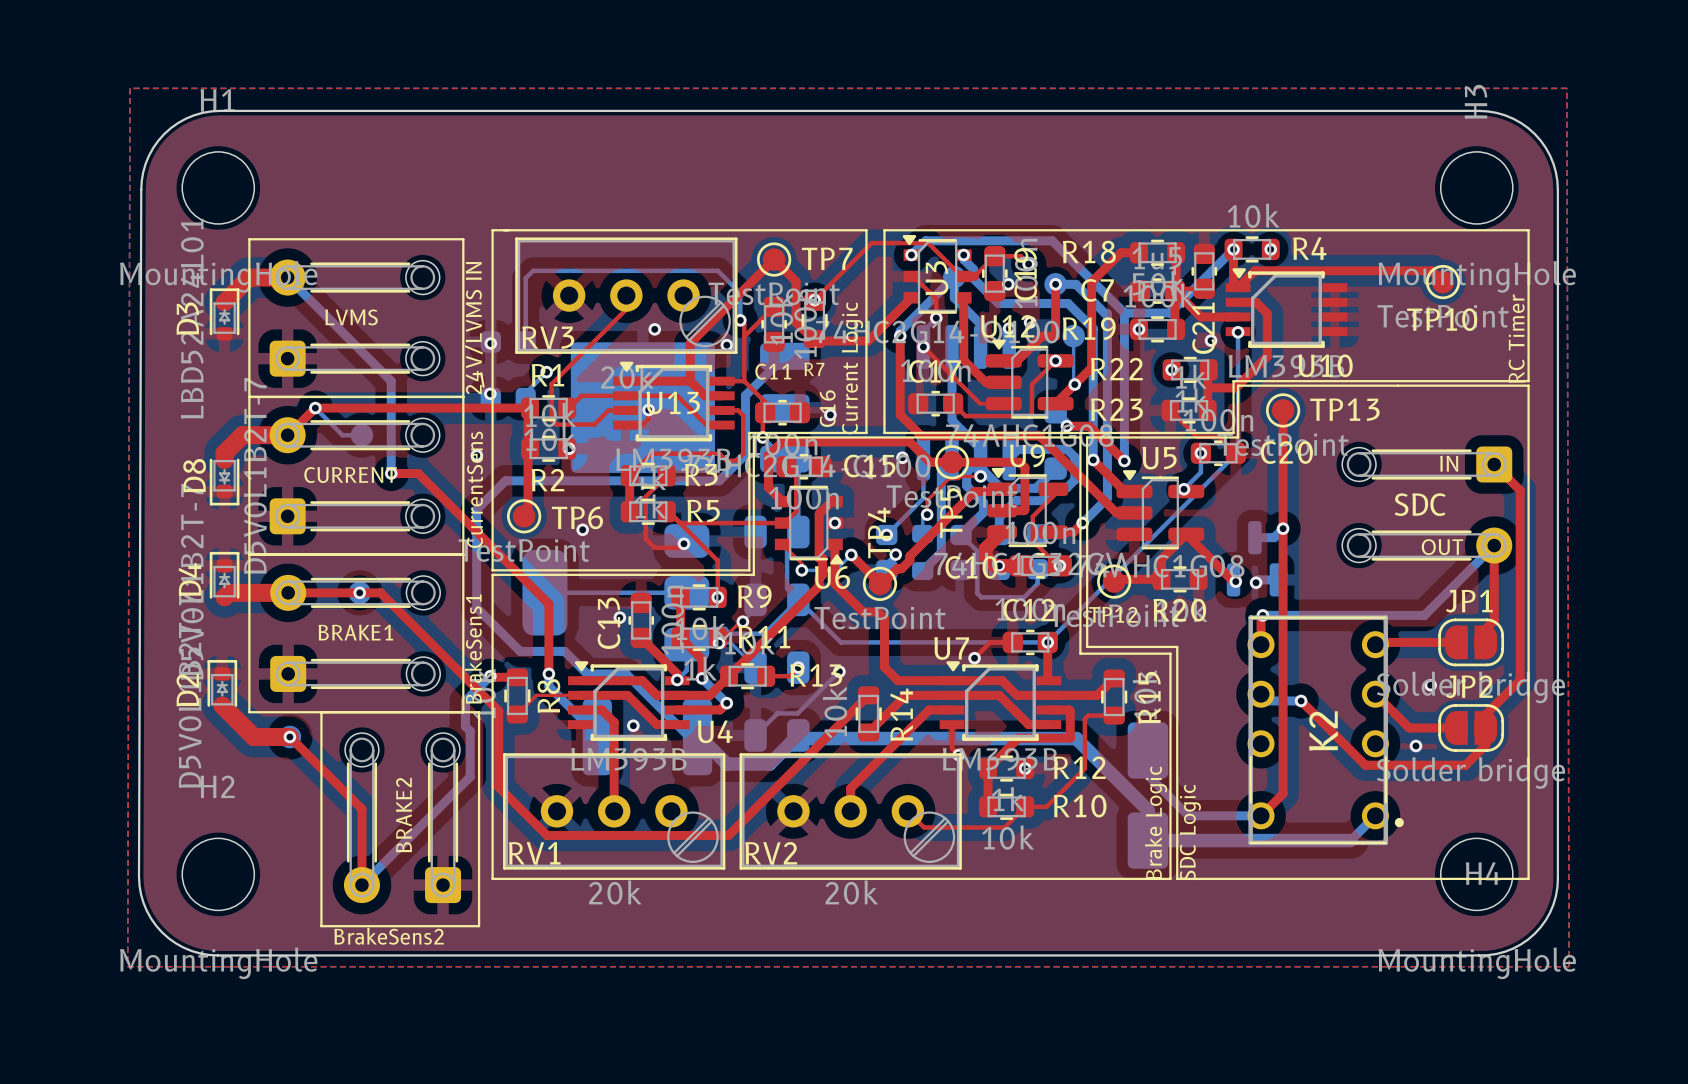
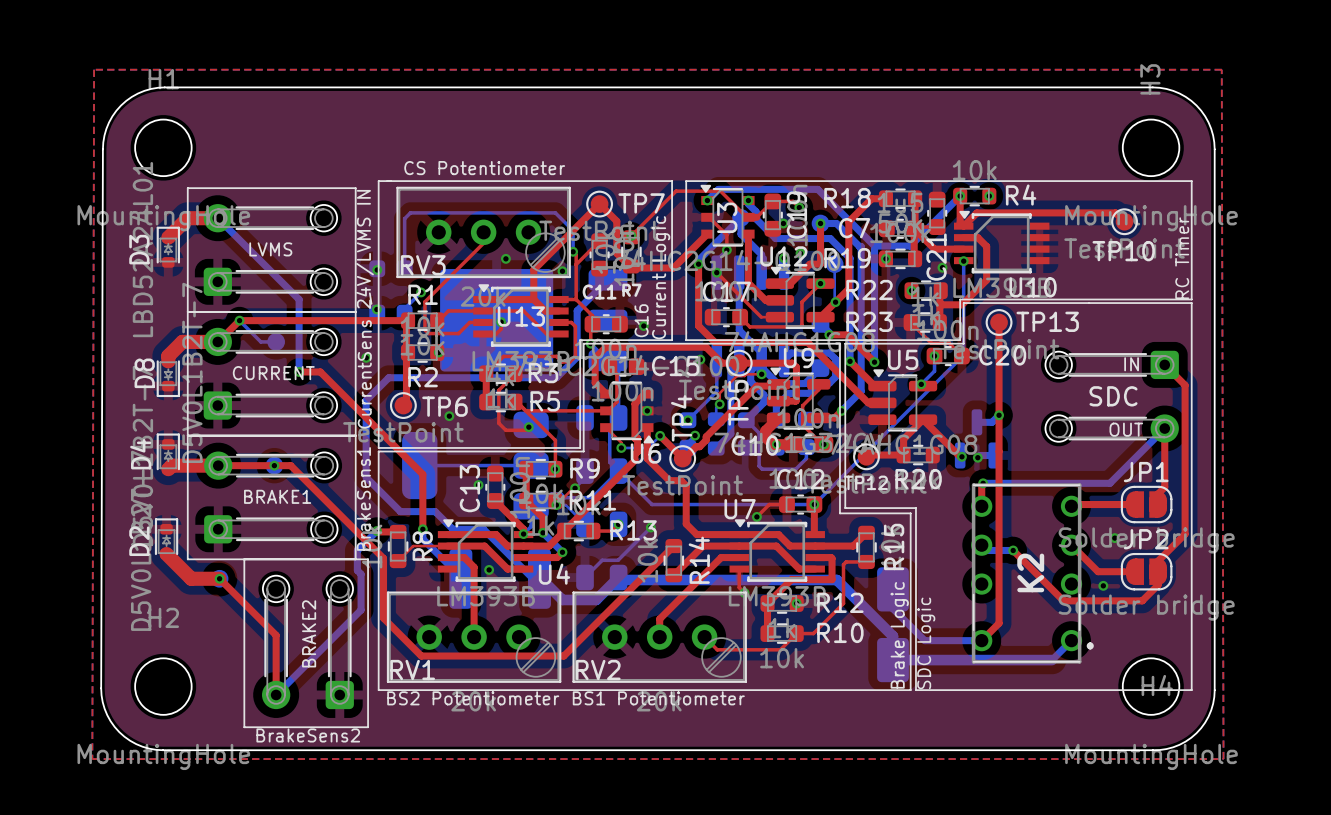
text: none -> CS Potentiometer (484, 168)
text: none -> BS2 Potentiometer (473, 698)
text: none -> BS1 Potentiometer (658, 698)

